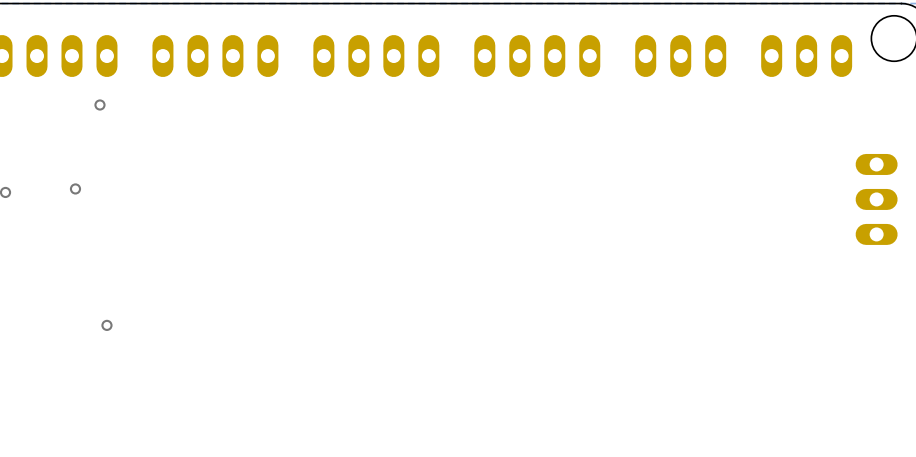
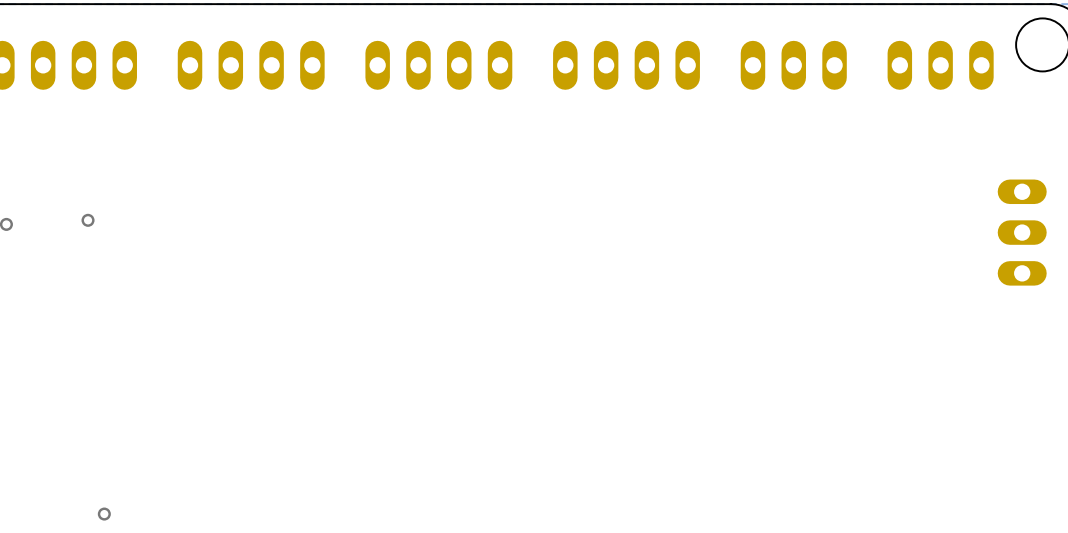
via: (99, 104) -> none
via: (106, 325) -> none
via: none -> (104, 514)

